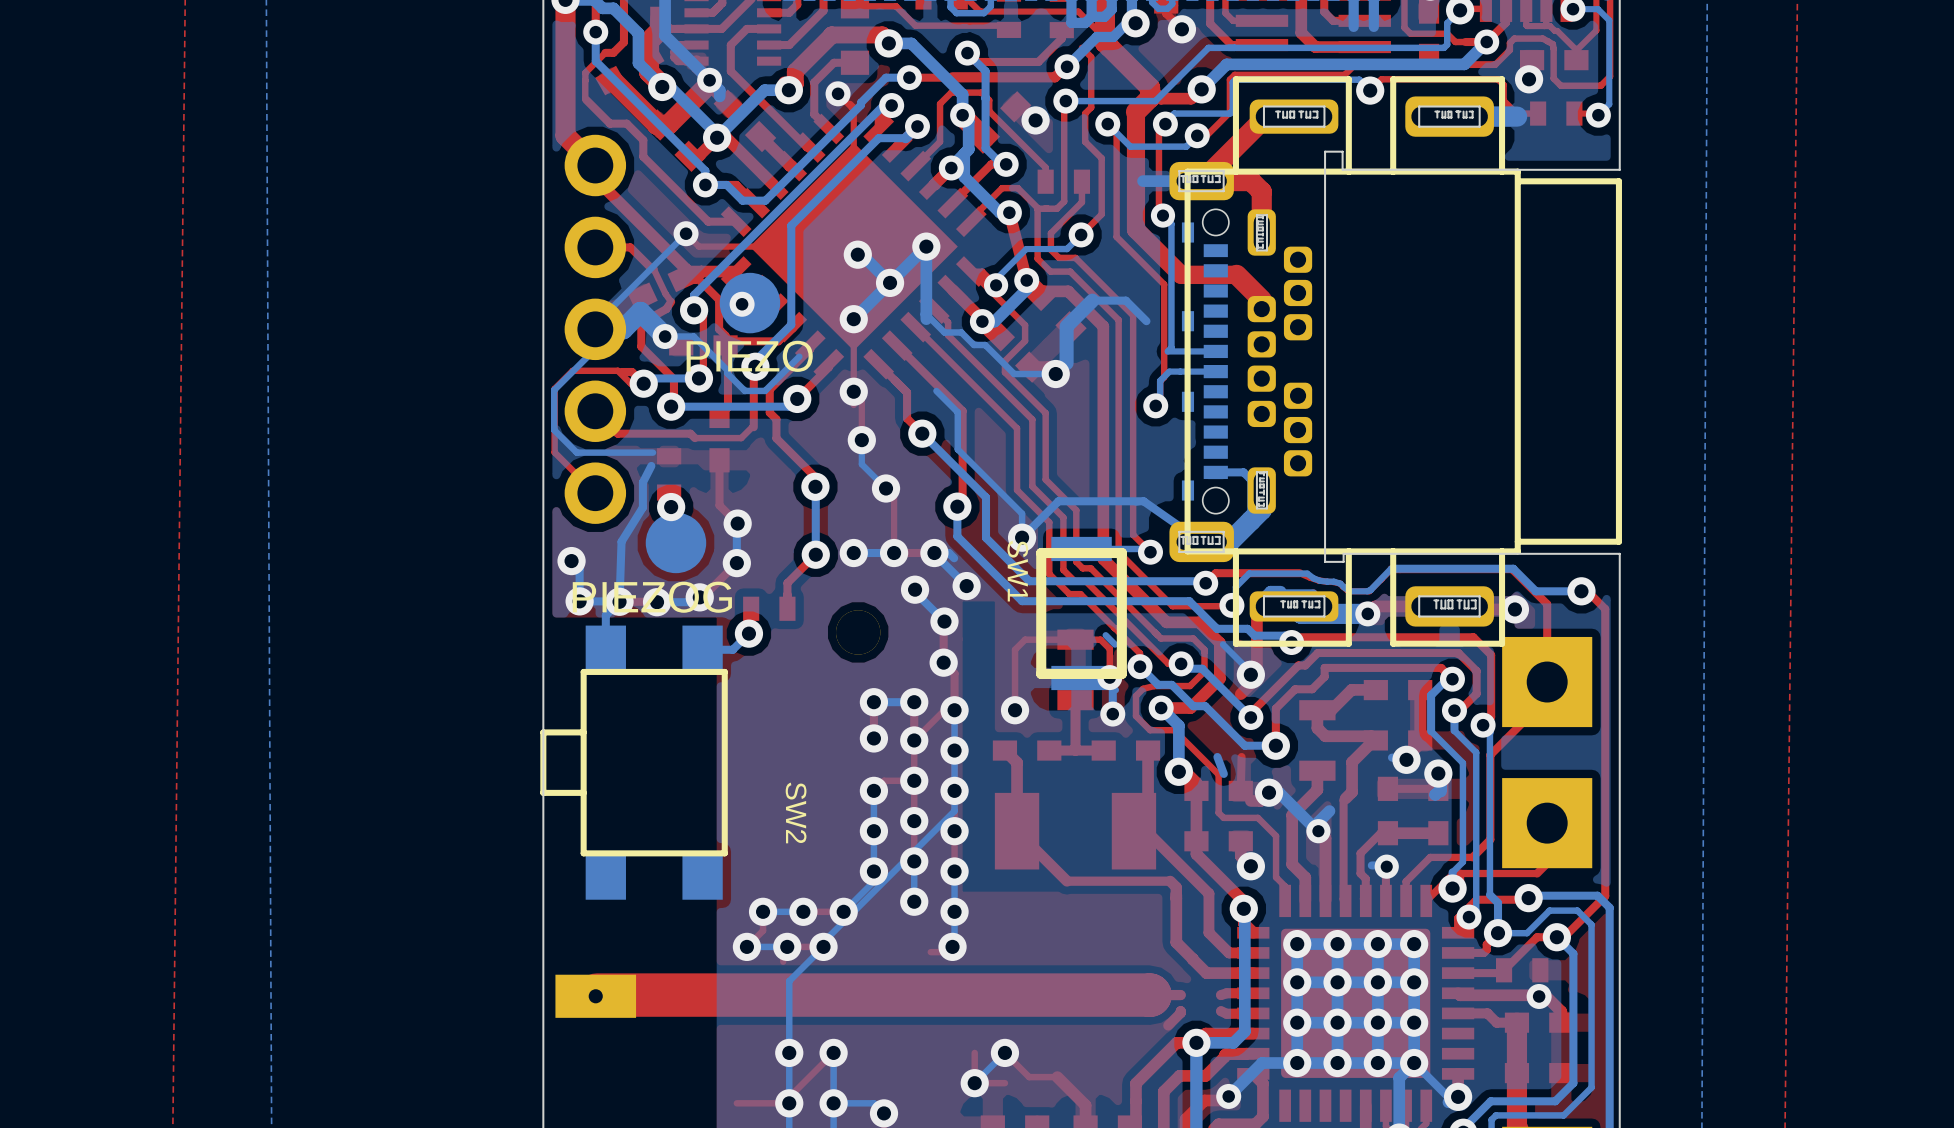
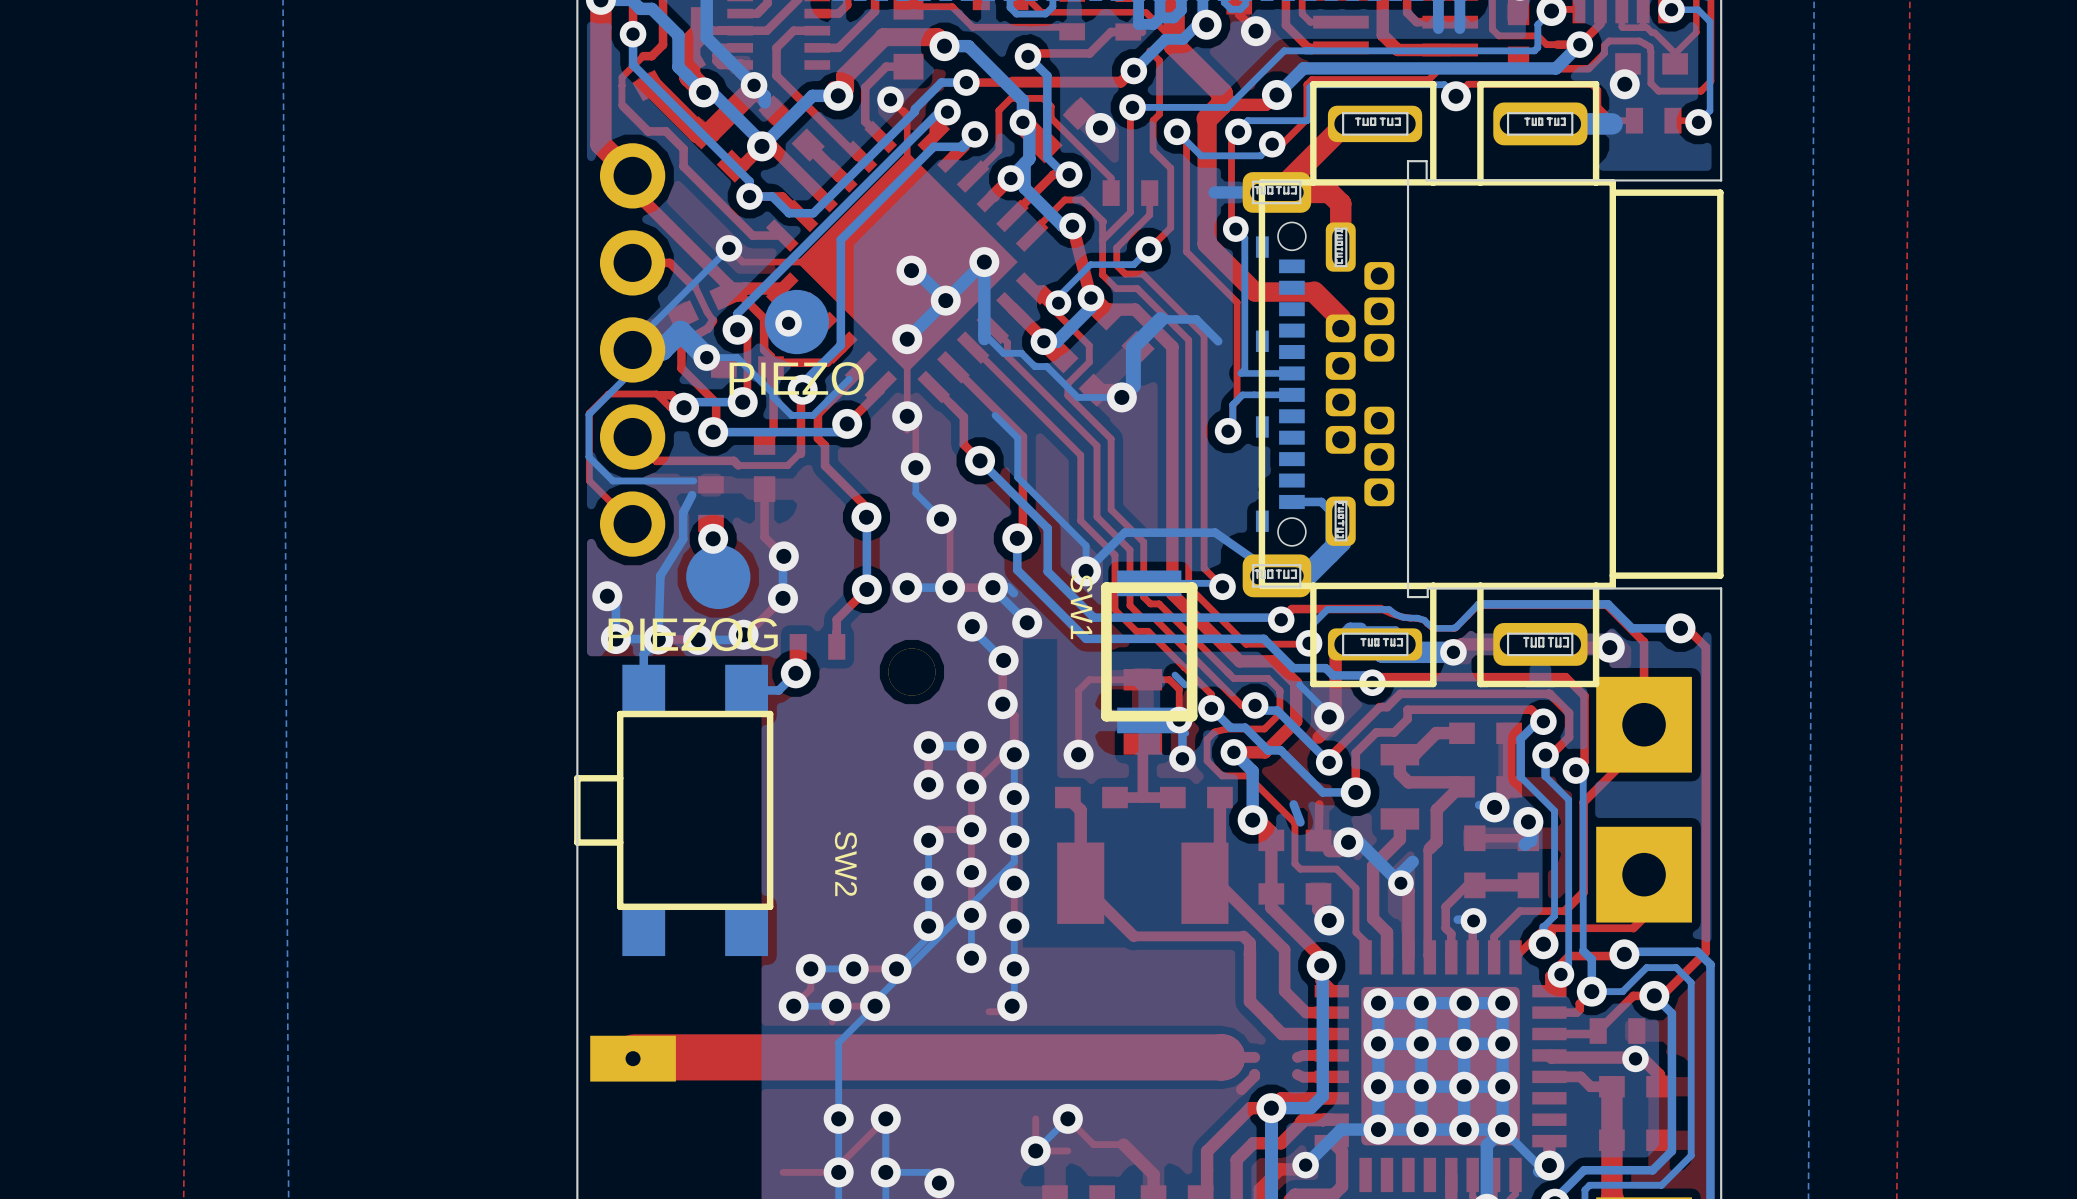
top track: (1061, 30) (1061, 38) (1038, 61) (976, 61) (967, 53) -> (1141, 32) (1111, 32) (1089, 53) (1031, 53) (1028, 56)
top track: (1064, 102) (1064, 201) (1056, 208) (1038, 208) -> (1130, 109) (1130, 212) (1102, 240)

